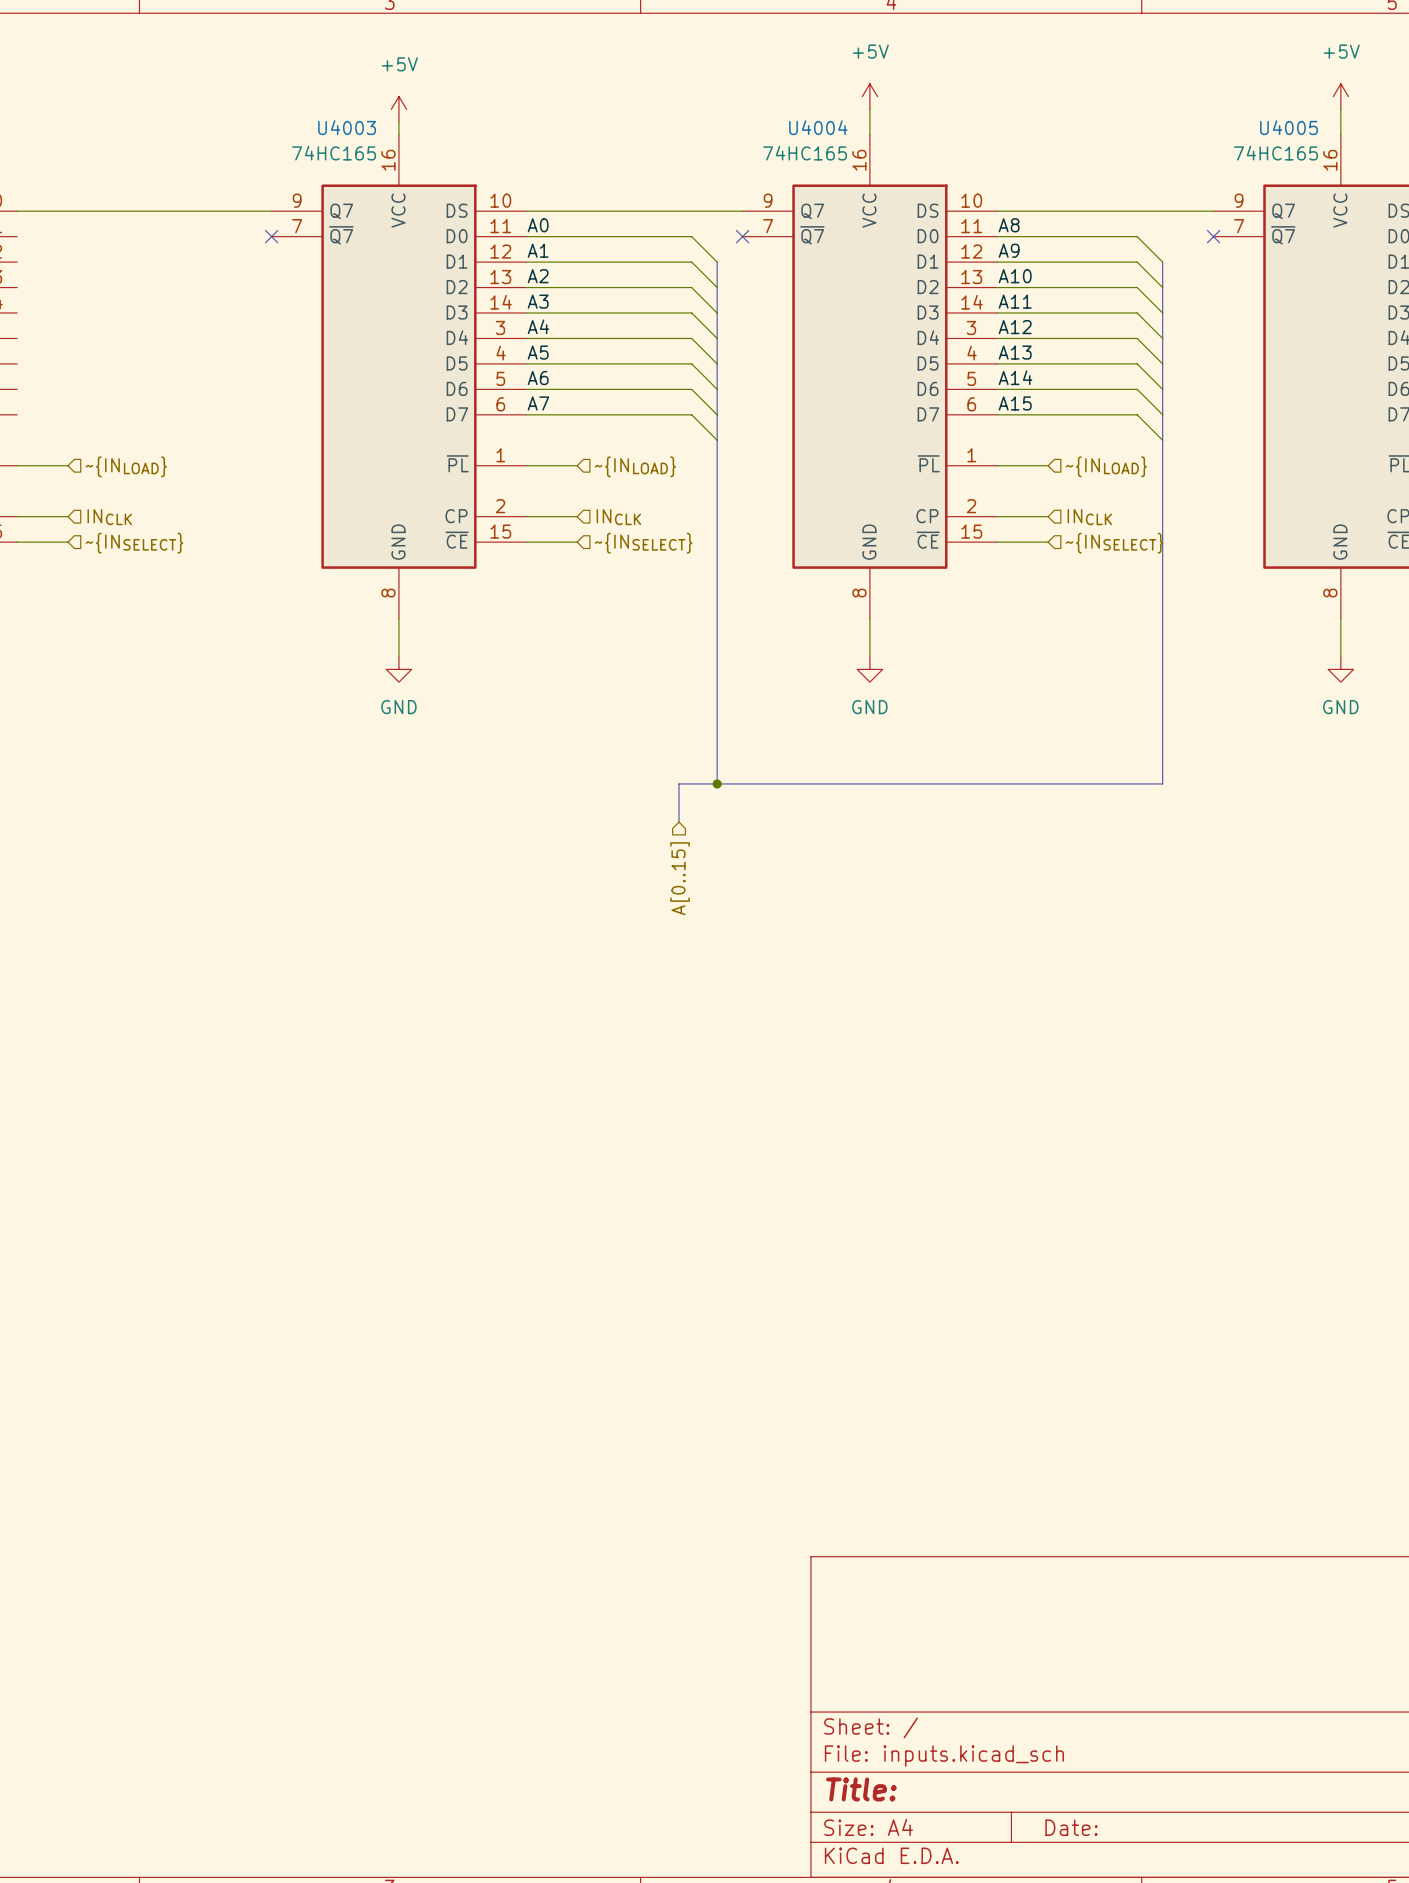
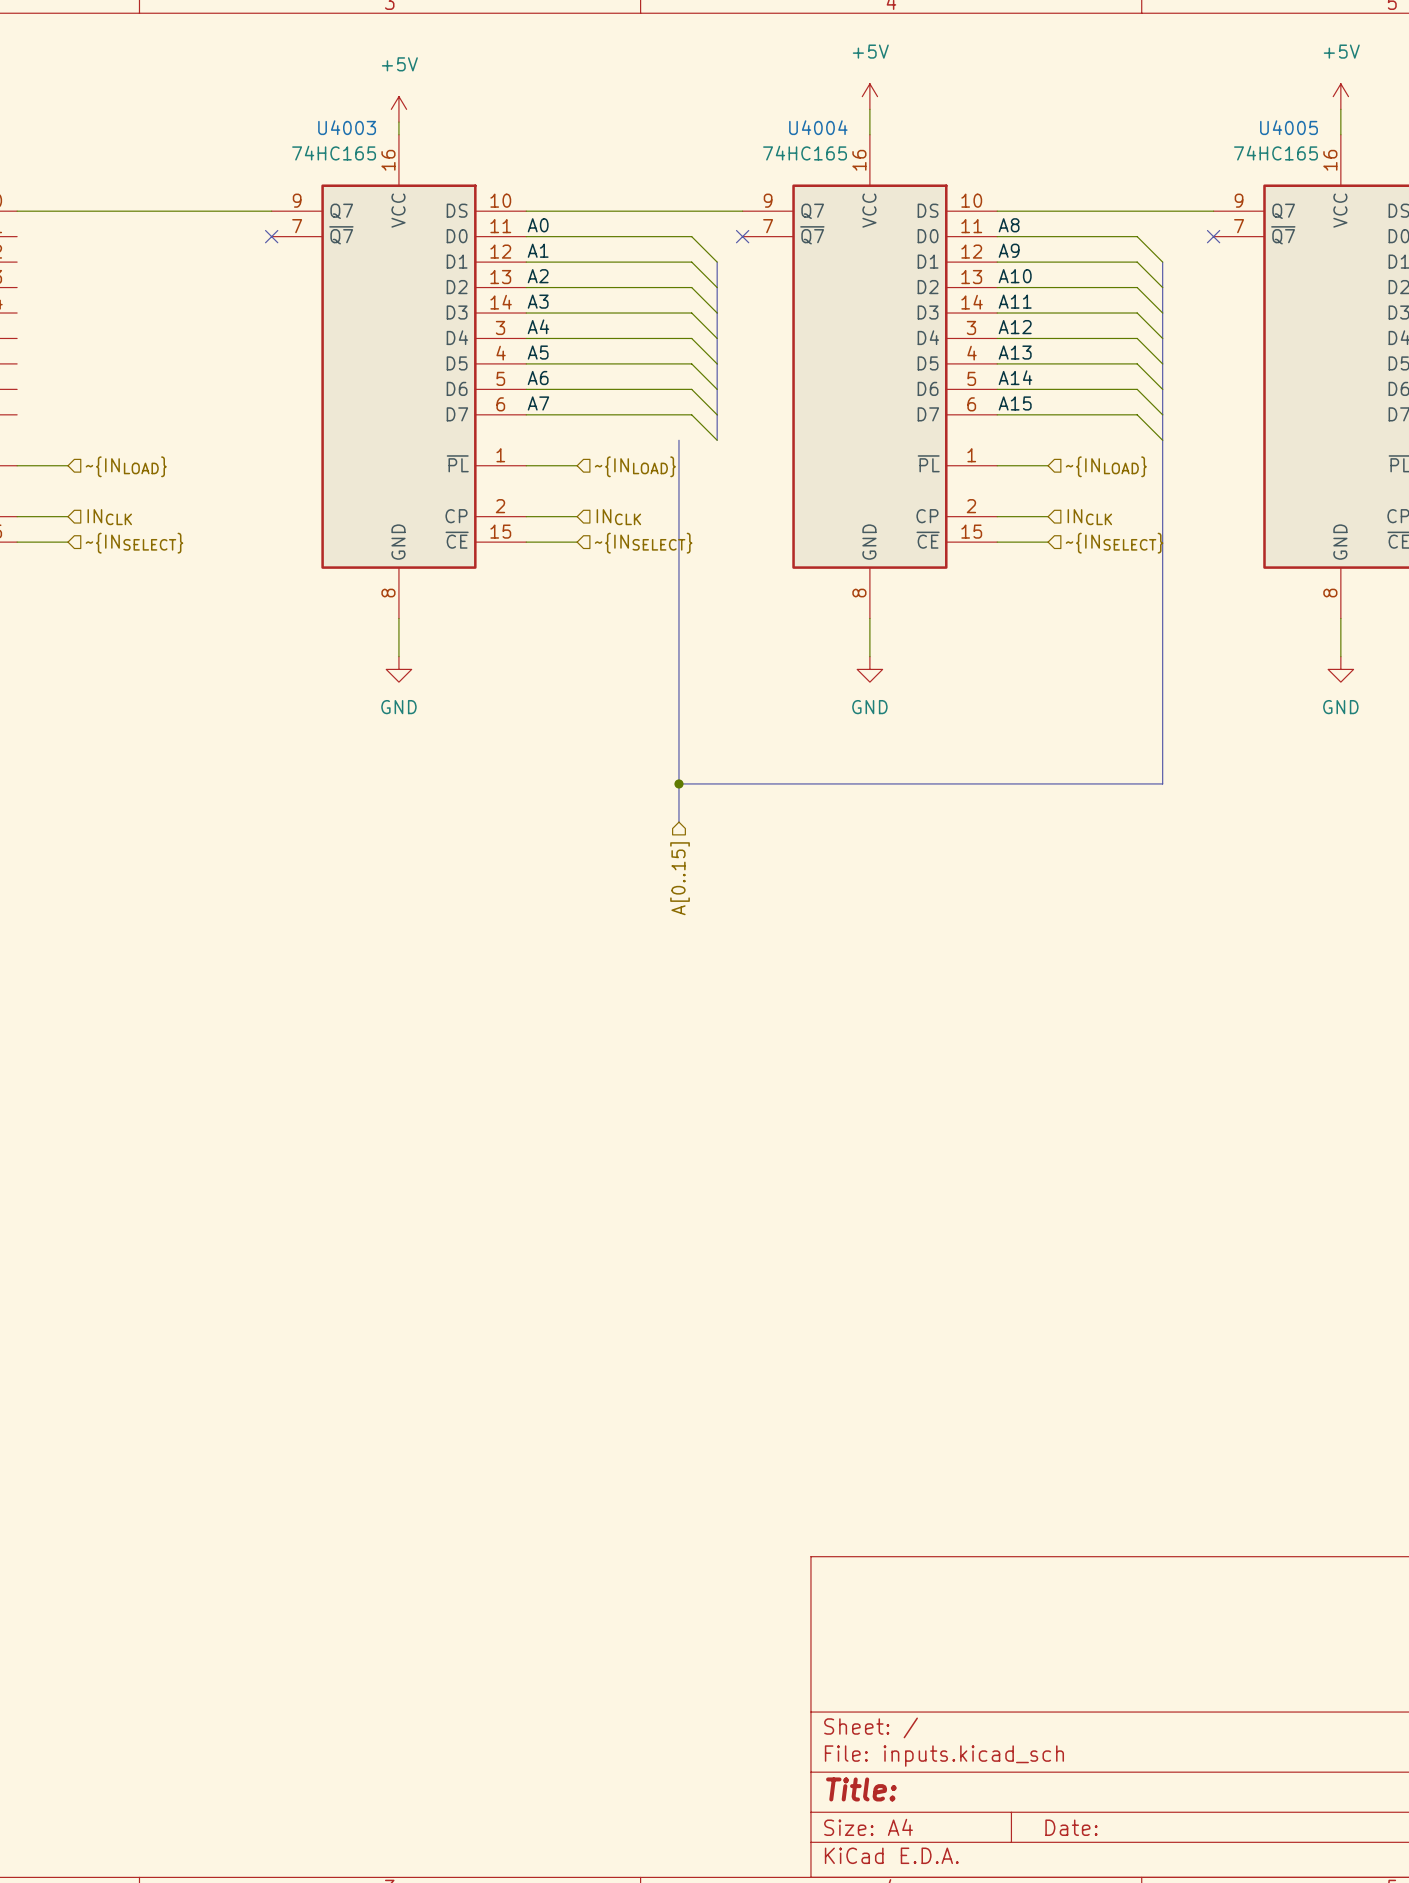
bus: (717, 440) (717, 783) -> (678, 440) (678, 783)
junction position: (717, 783) -> (678, 783)

